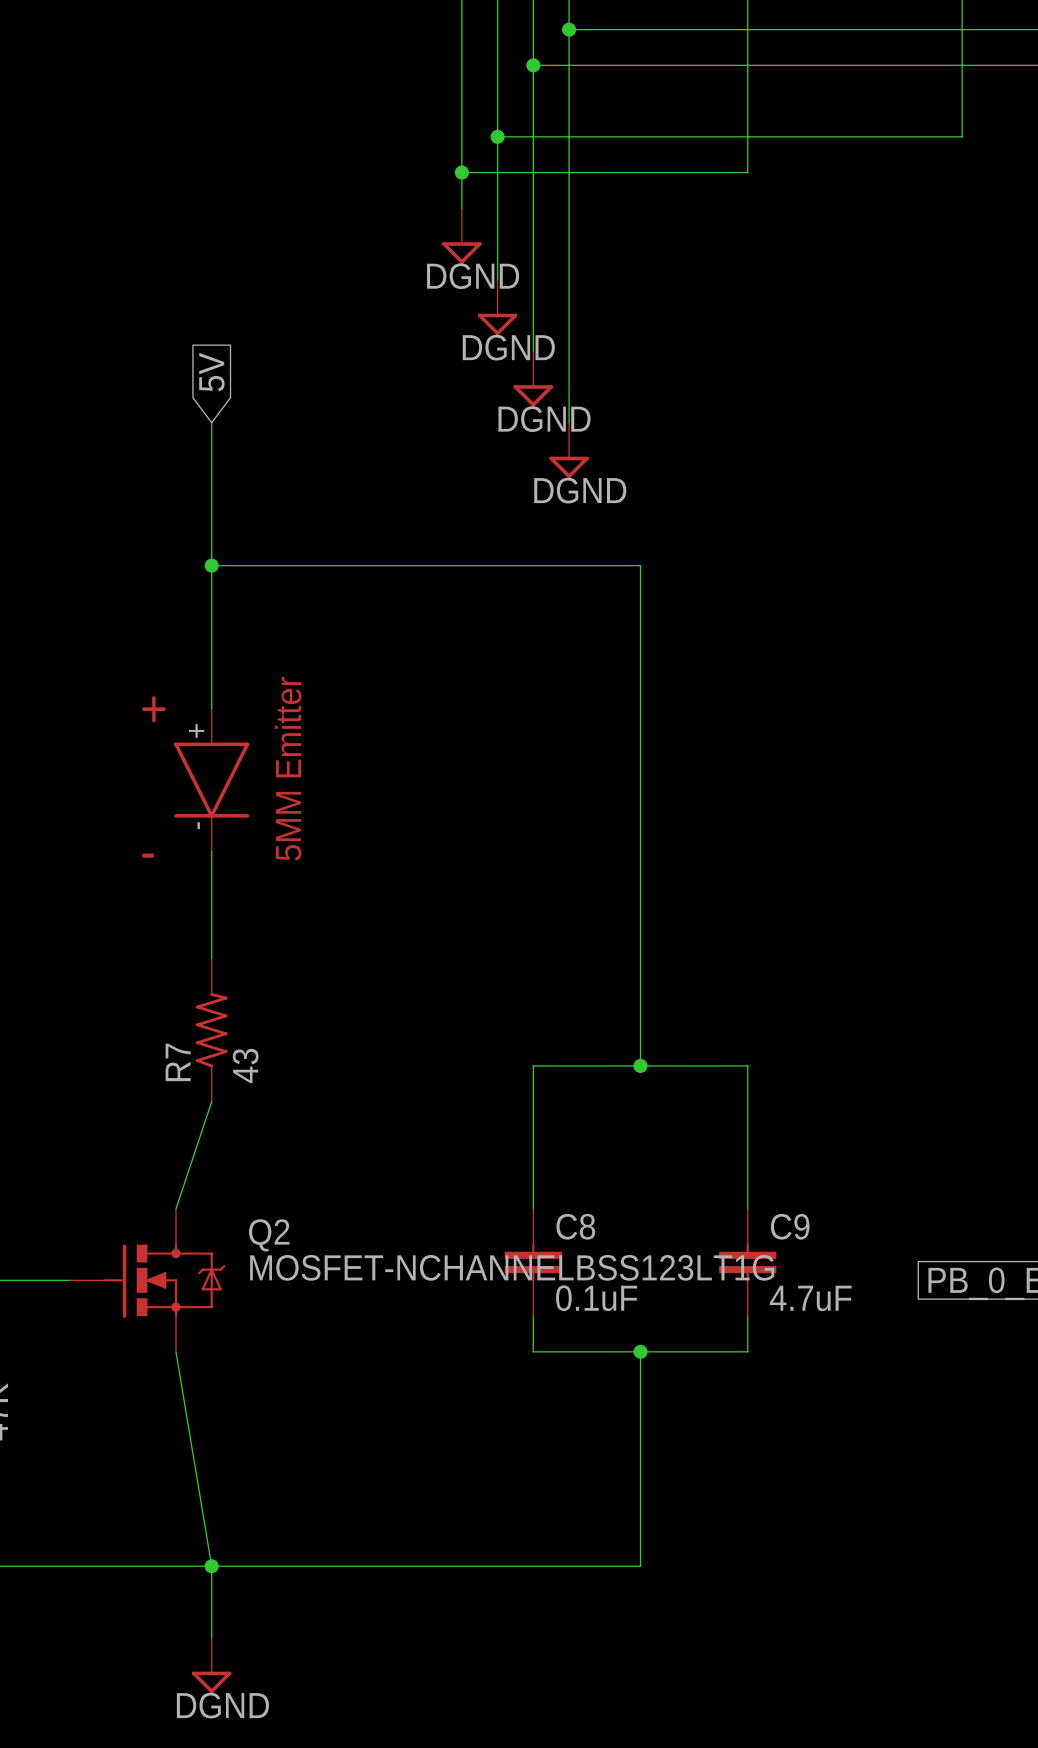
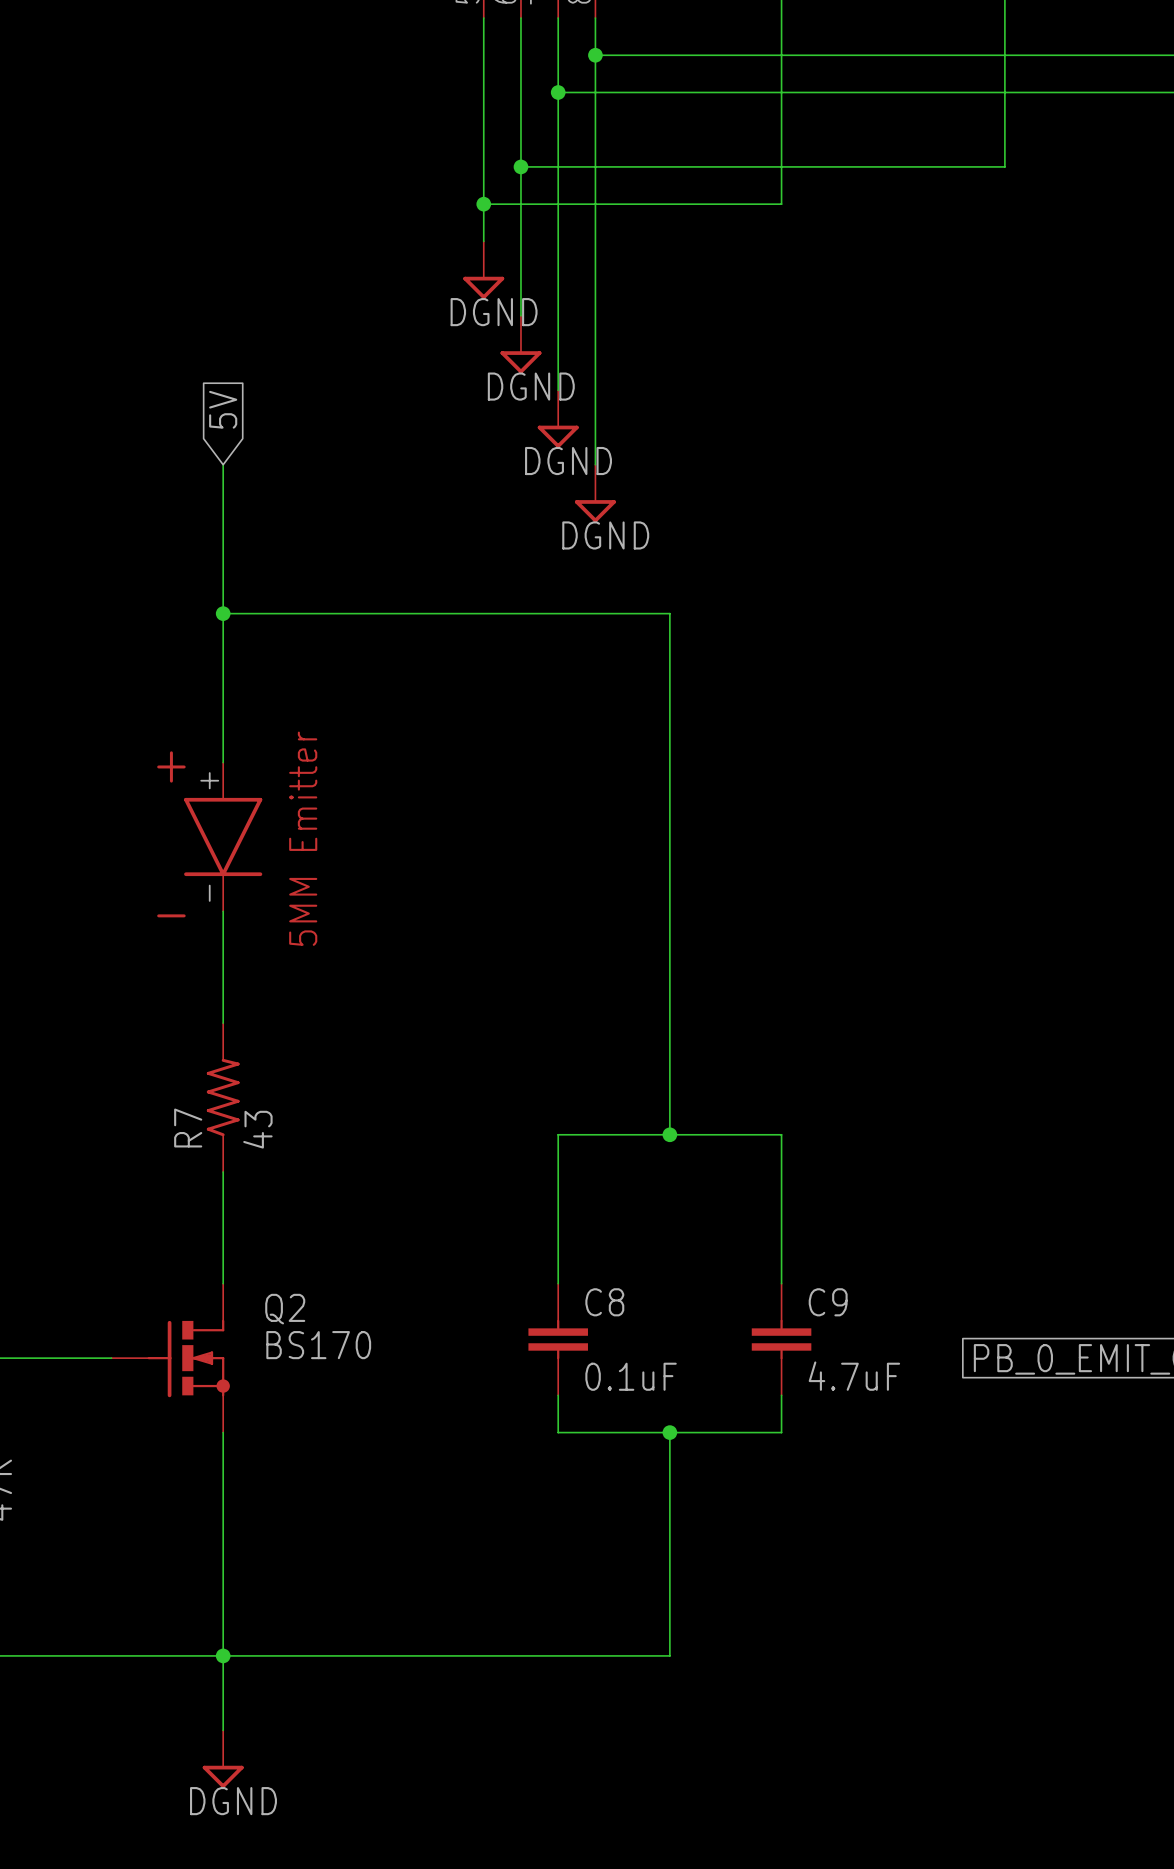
wire: (211, 1101) (175, 1208) -> (223, 1172) (223, 1283)
Q2 symbol: [68, 1208, 226, 1352] -> [111, 1283, 230, 1433]
Q2 value: MOSFET-NCHANNELBSS123LT1G (512, 1267) -> BS170 (318, 1345)
wire: (175, 1351) (211, 1566) -> (223, 1432) (223, 1655)

